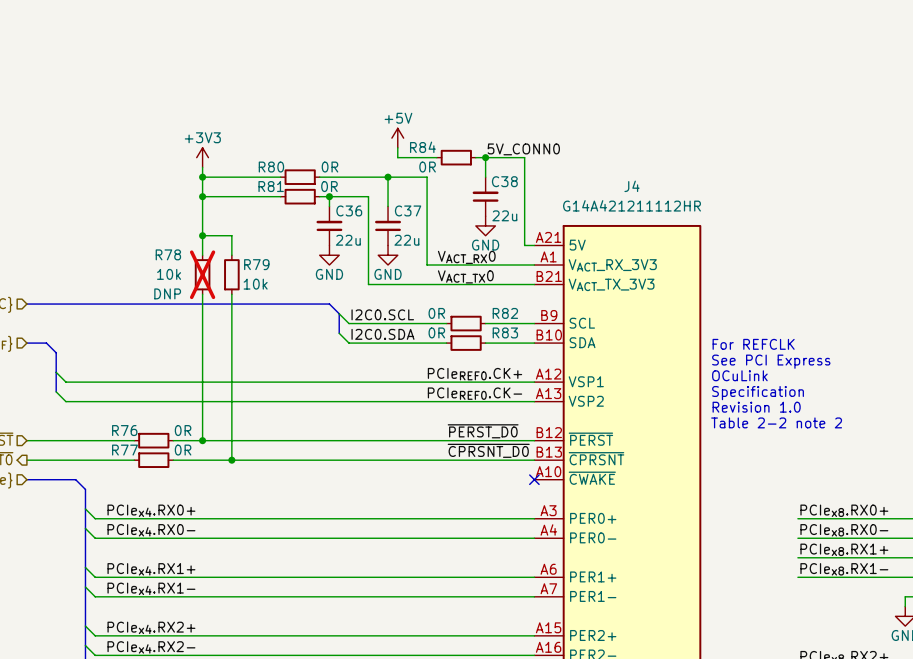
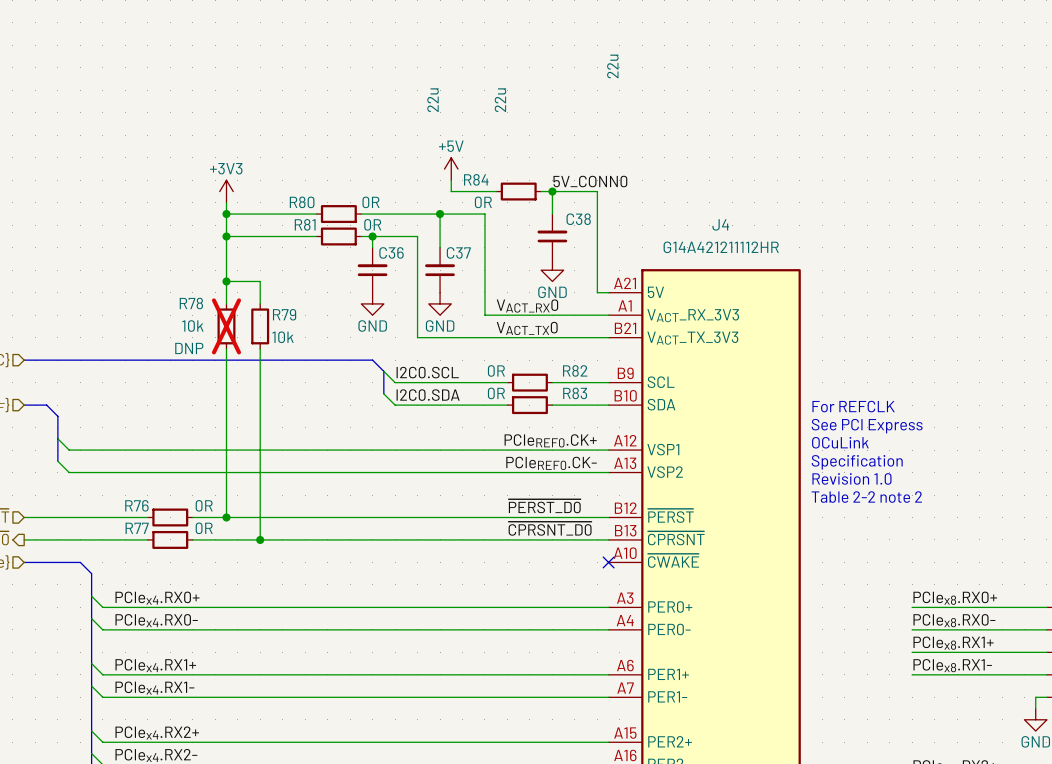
C38 text rotation: 0° (504, 215) -> 90° counterclockwise (612, 66)
C38 text position: 22u (504, 215) -> 22u (612, 66)
C36 text rotation: 0° (348, 240) -> 90° counterclockwise (433, 100)
C36 text position: 22u (348, 240) -> 22u (433, 100)
C37 text rotation: 0° (406, 240) -> 90° counterclockwise (500, 100)
C37 text position: 22u (406, 240) -> 22u (500, 100)

